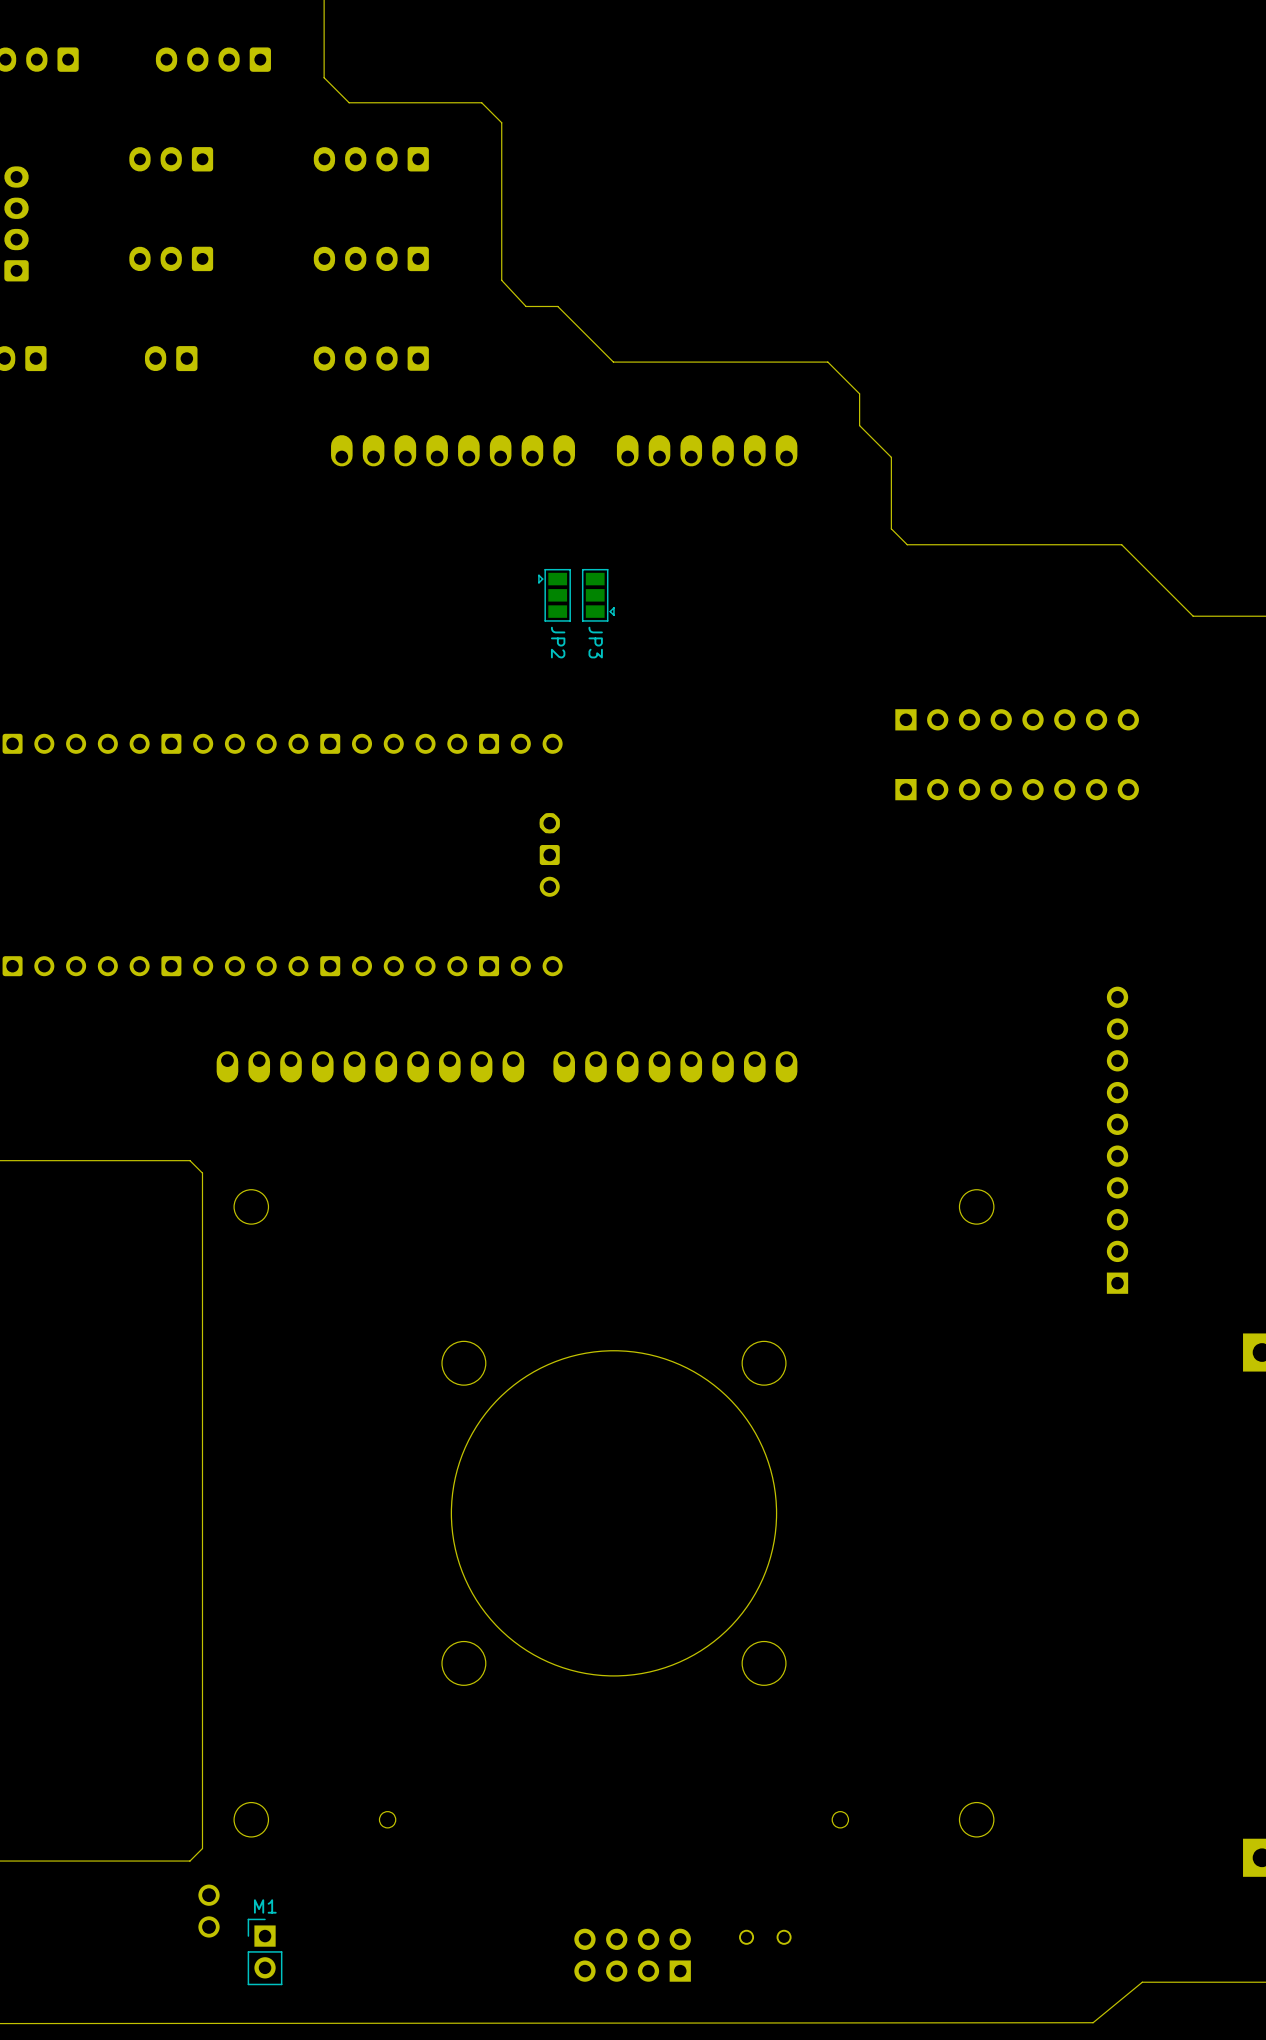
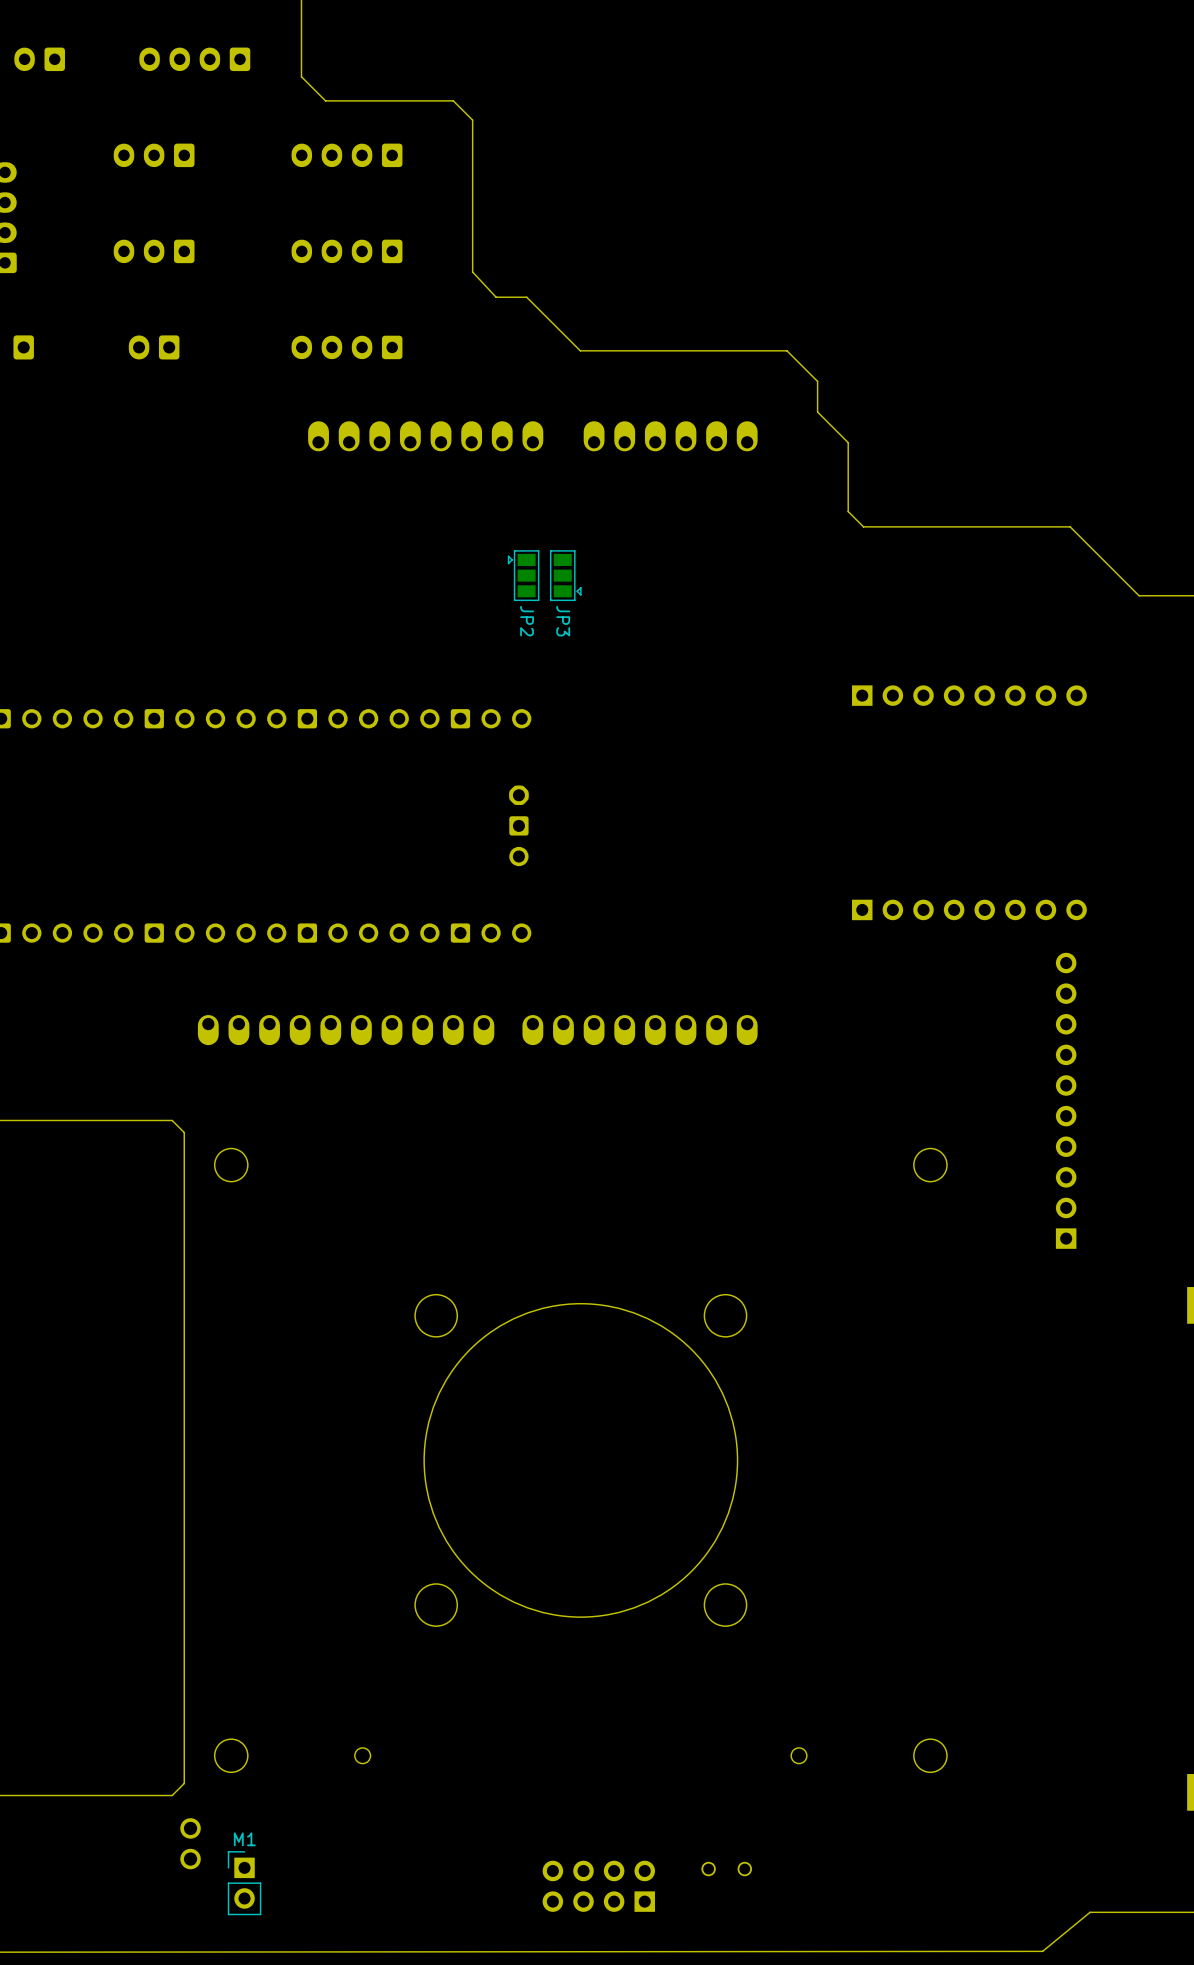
part position: (1017, 789) -> (969, 909)

